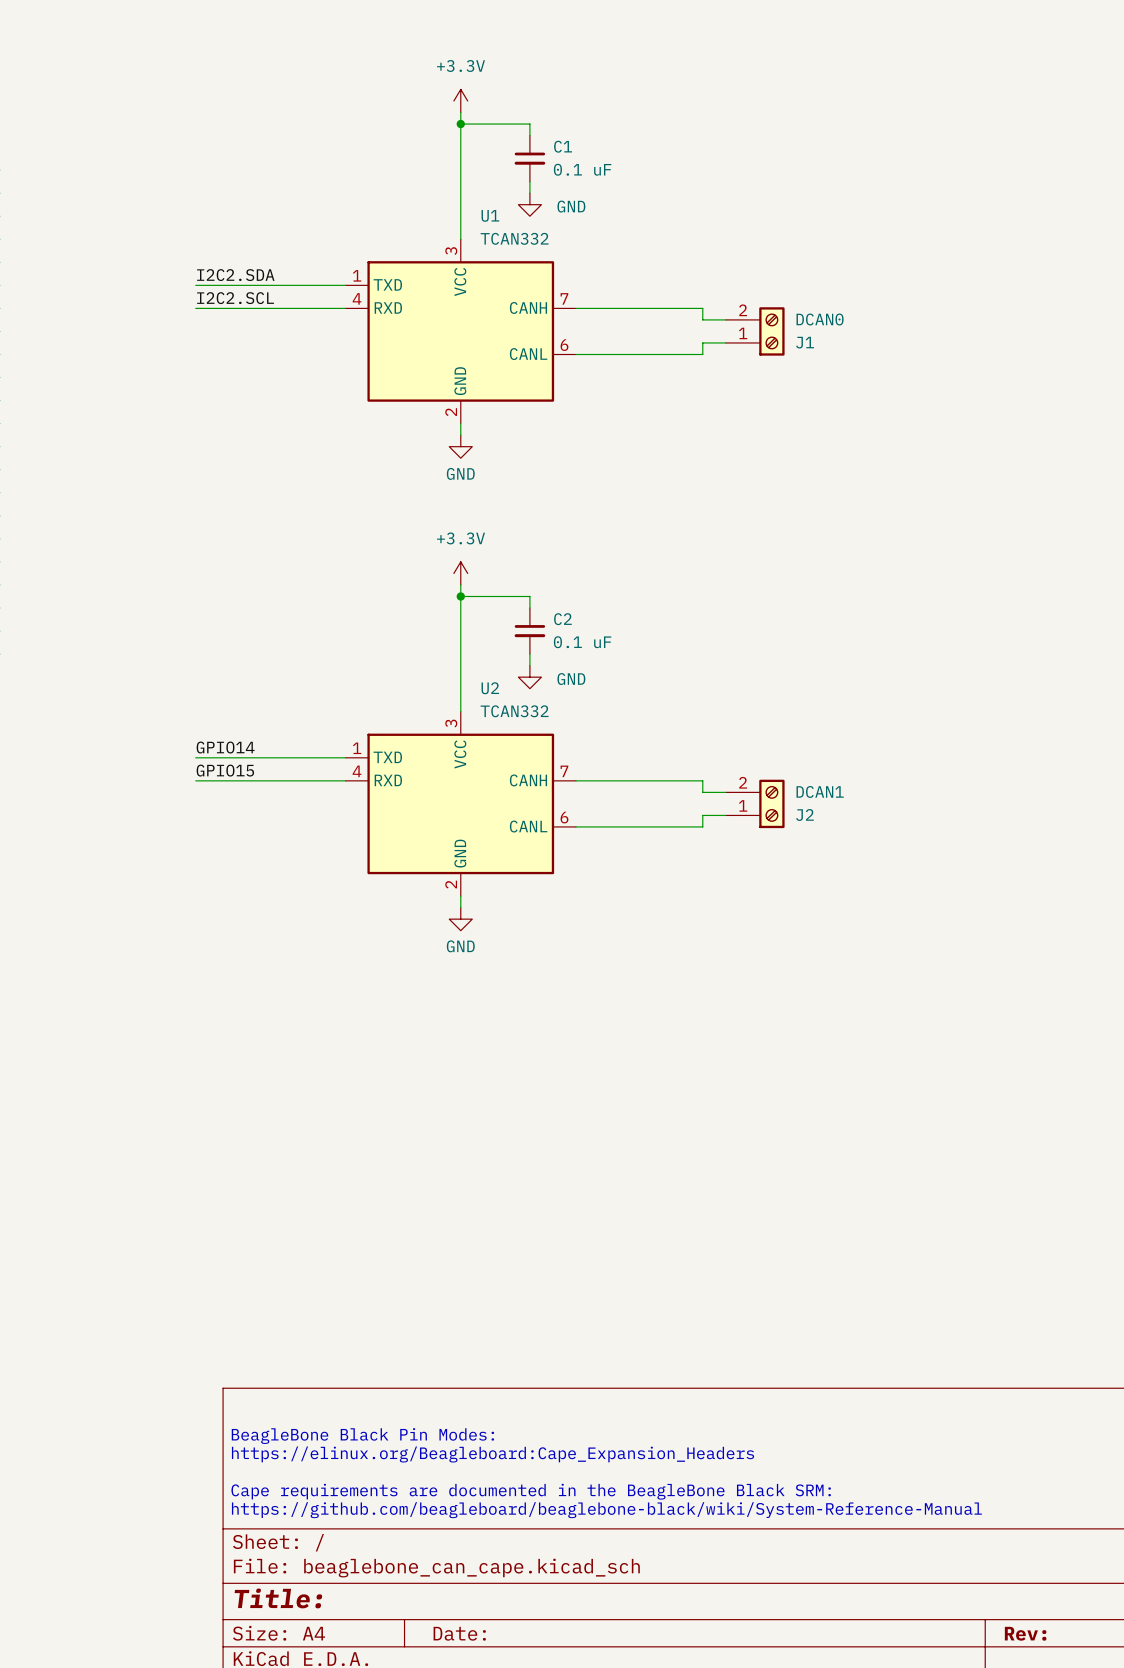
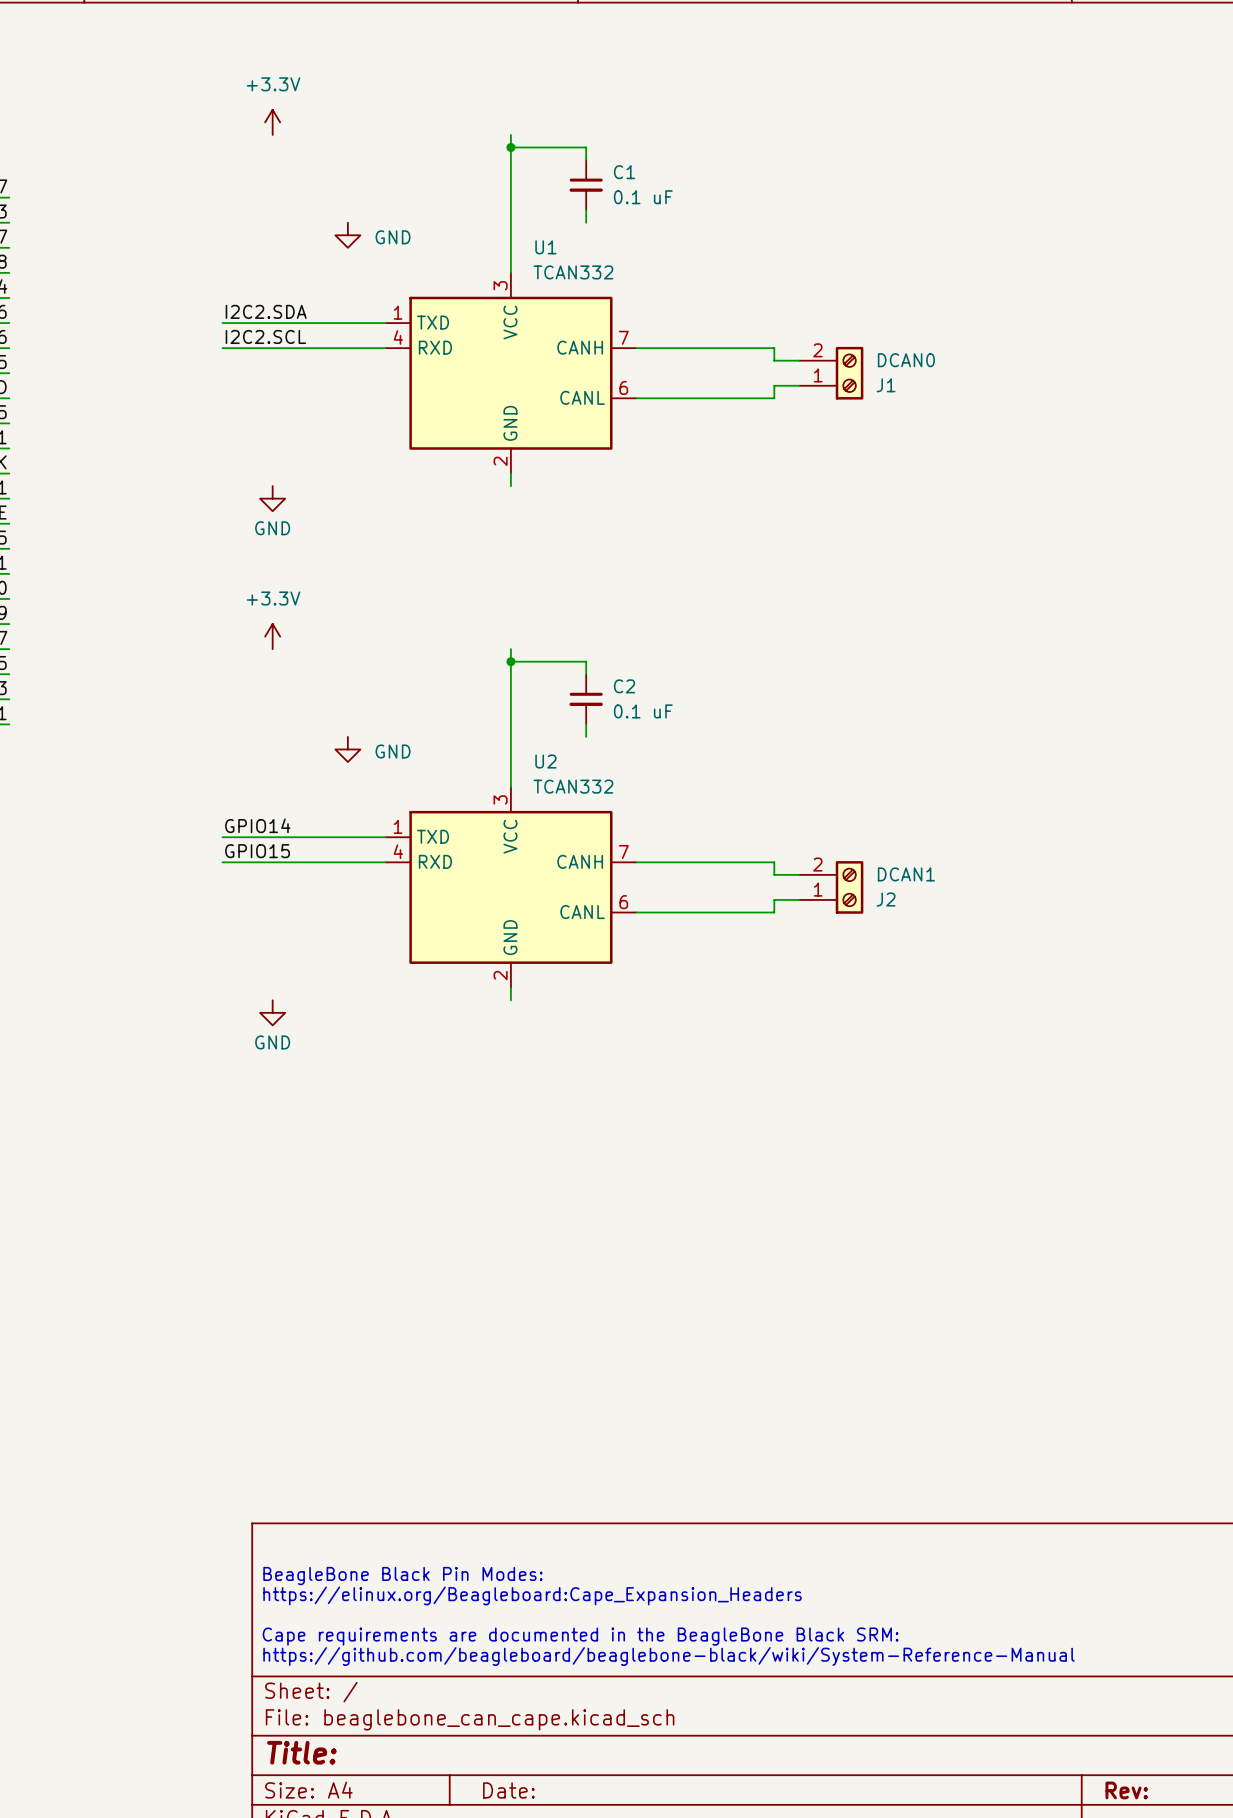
power symbol position: +3.3V (460, 100) -> +3.3V (272, 122)
power symbol: none -> GND (347, 235)
power symbol: GND (529, 204) -> none
power symbol: none -> GND (272, 498)
power symbol: GND (460, 446) -> none
power symbol position: +3.3V (460, 573) -> +3.3V (272, 636)
power symbol: none -> GND (347, 749)
power symbol: GND (529, 677) -> none
power symbol: none -> GND (272, 1012)
power symbol: GND (460, 919) -> none

